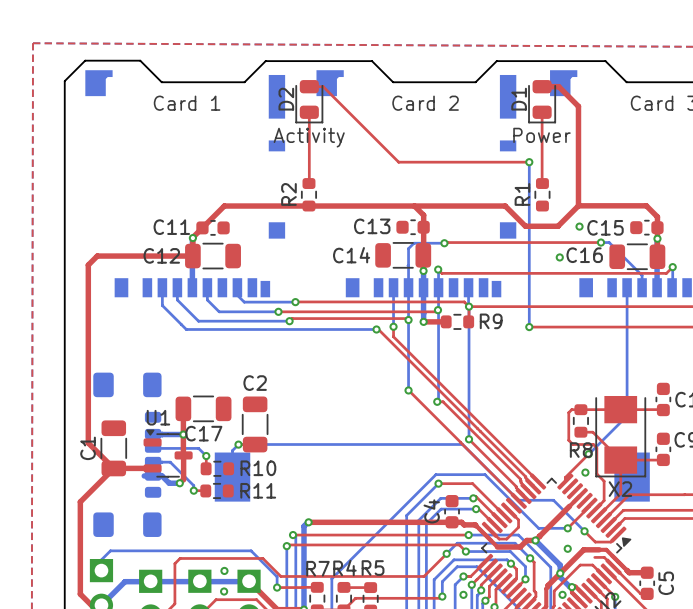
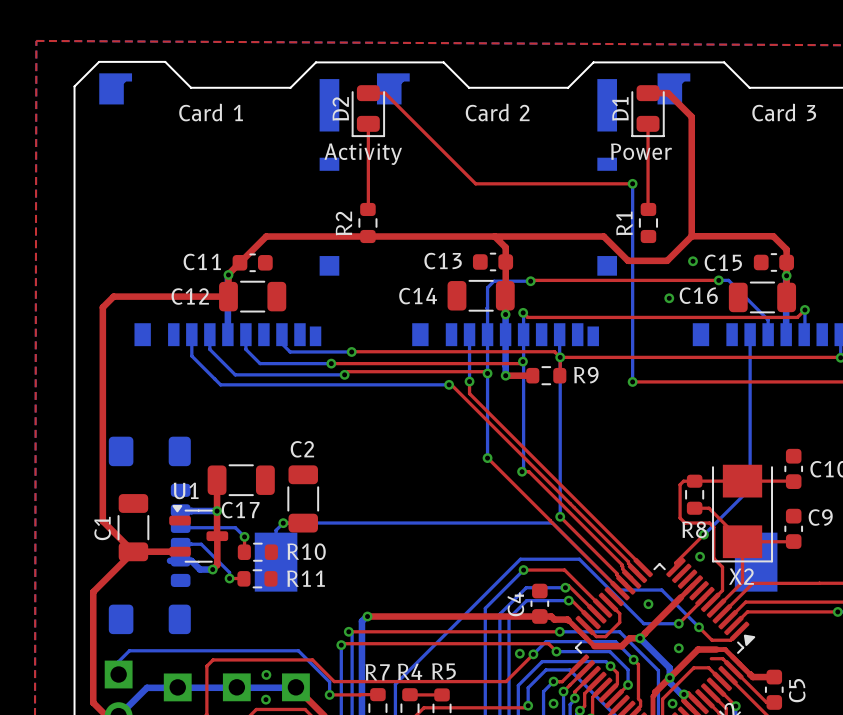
via: none -> (648, 604)
via: none -> (519, 653)

